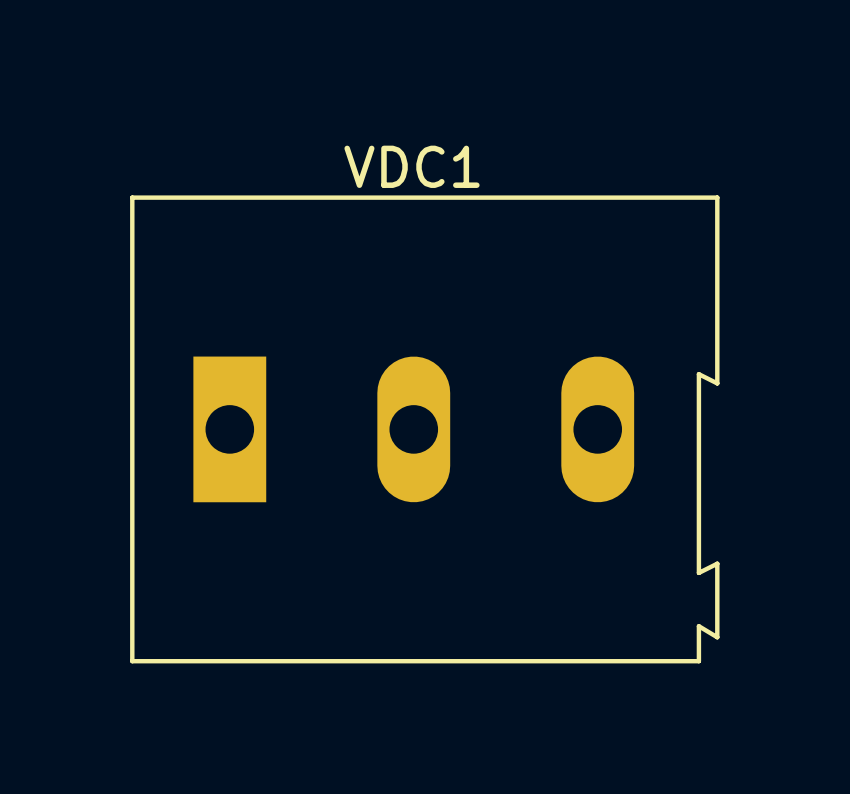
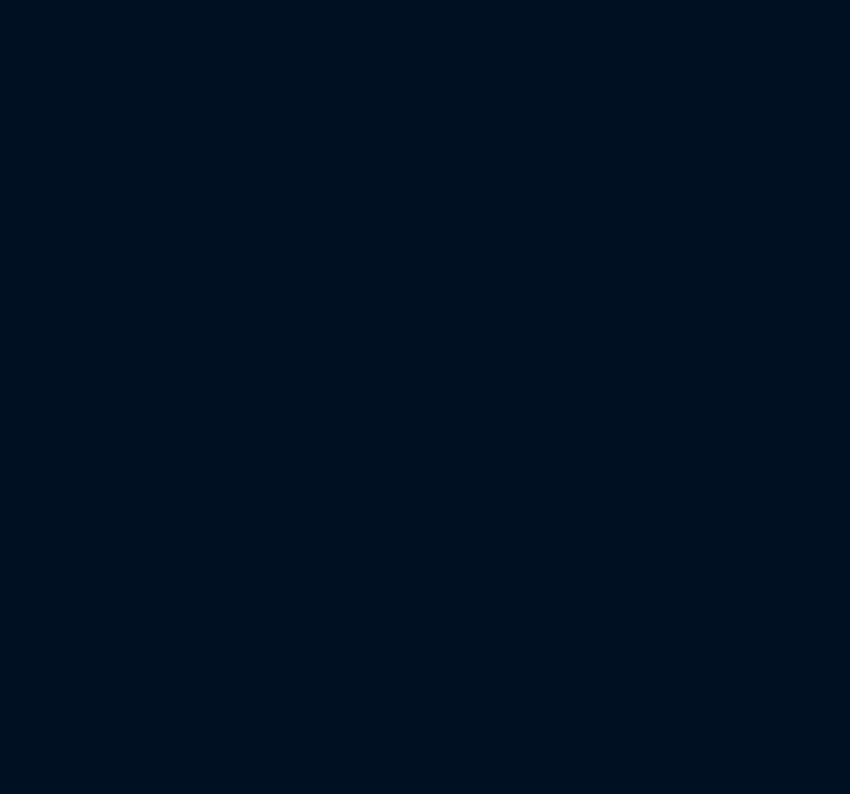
VDC1: (424, 429) -> none

